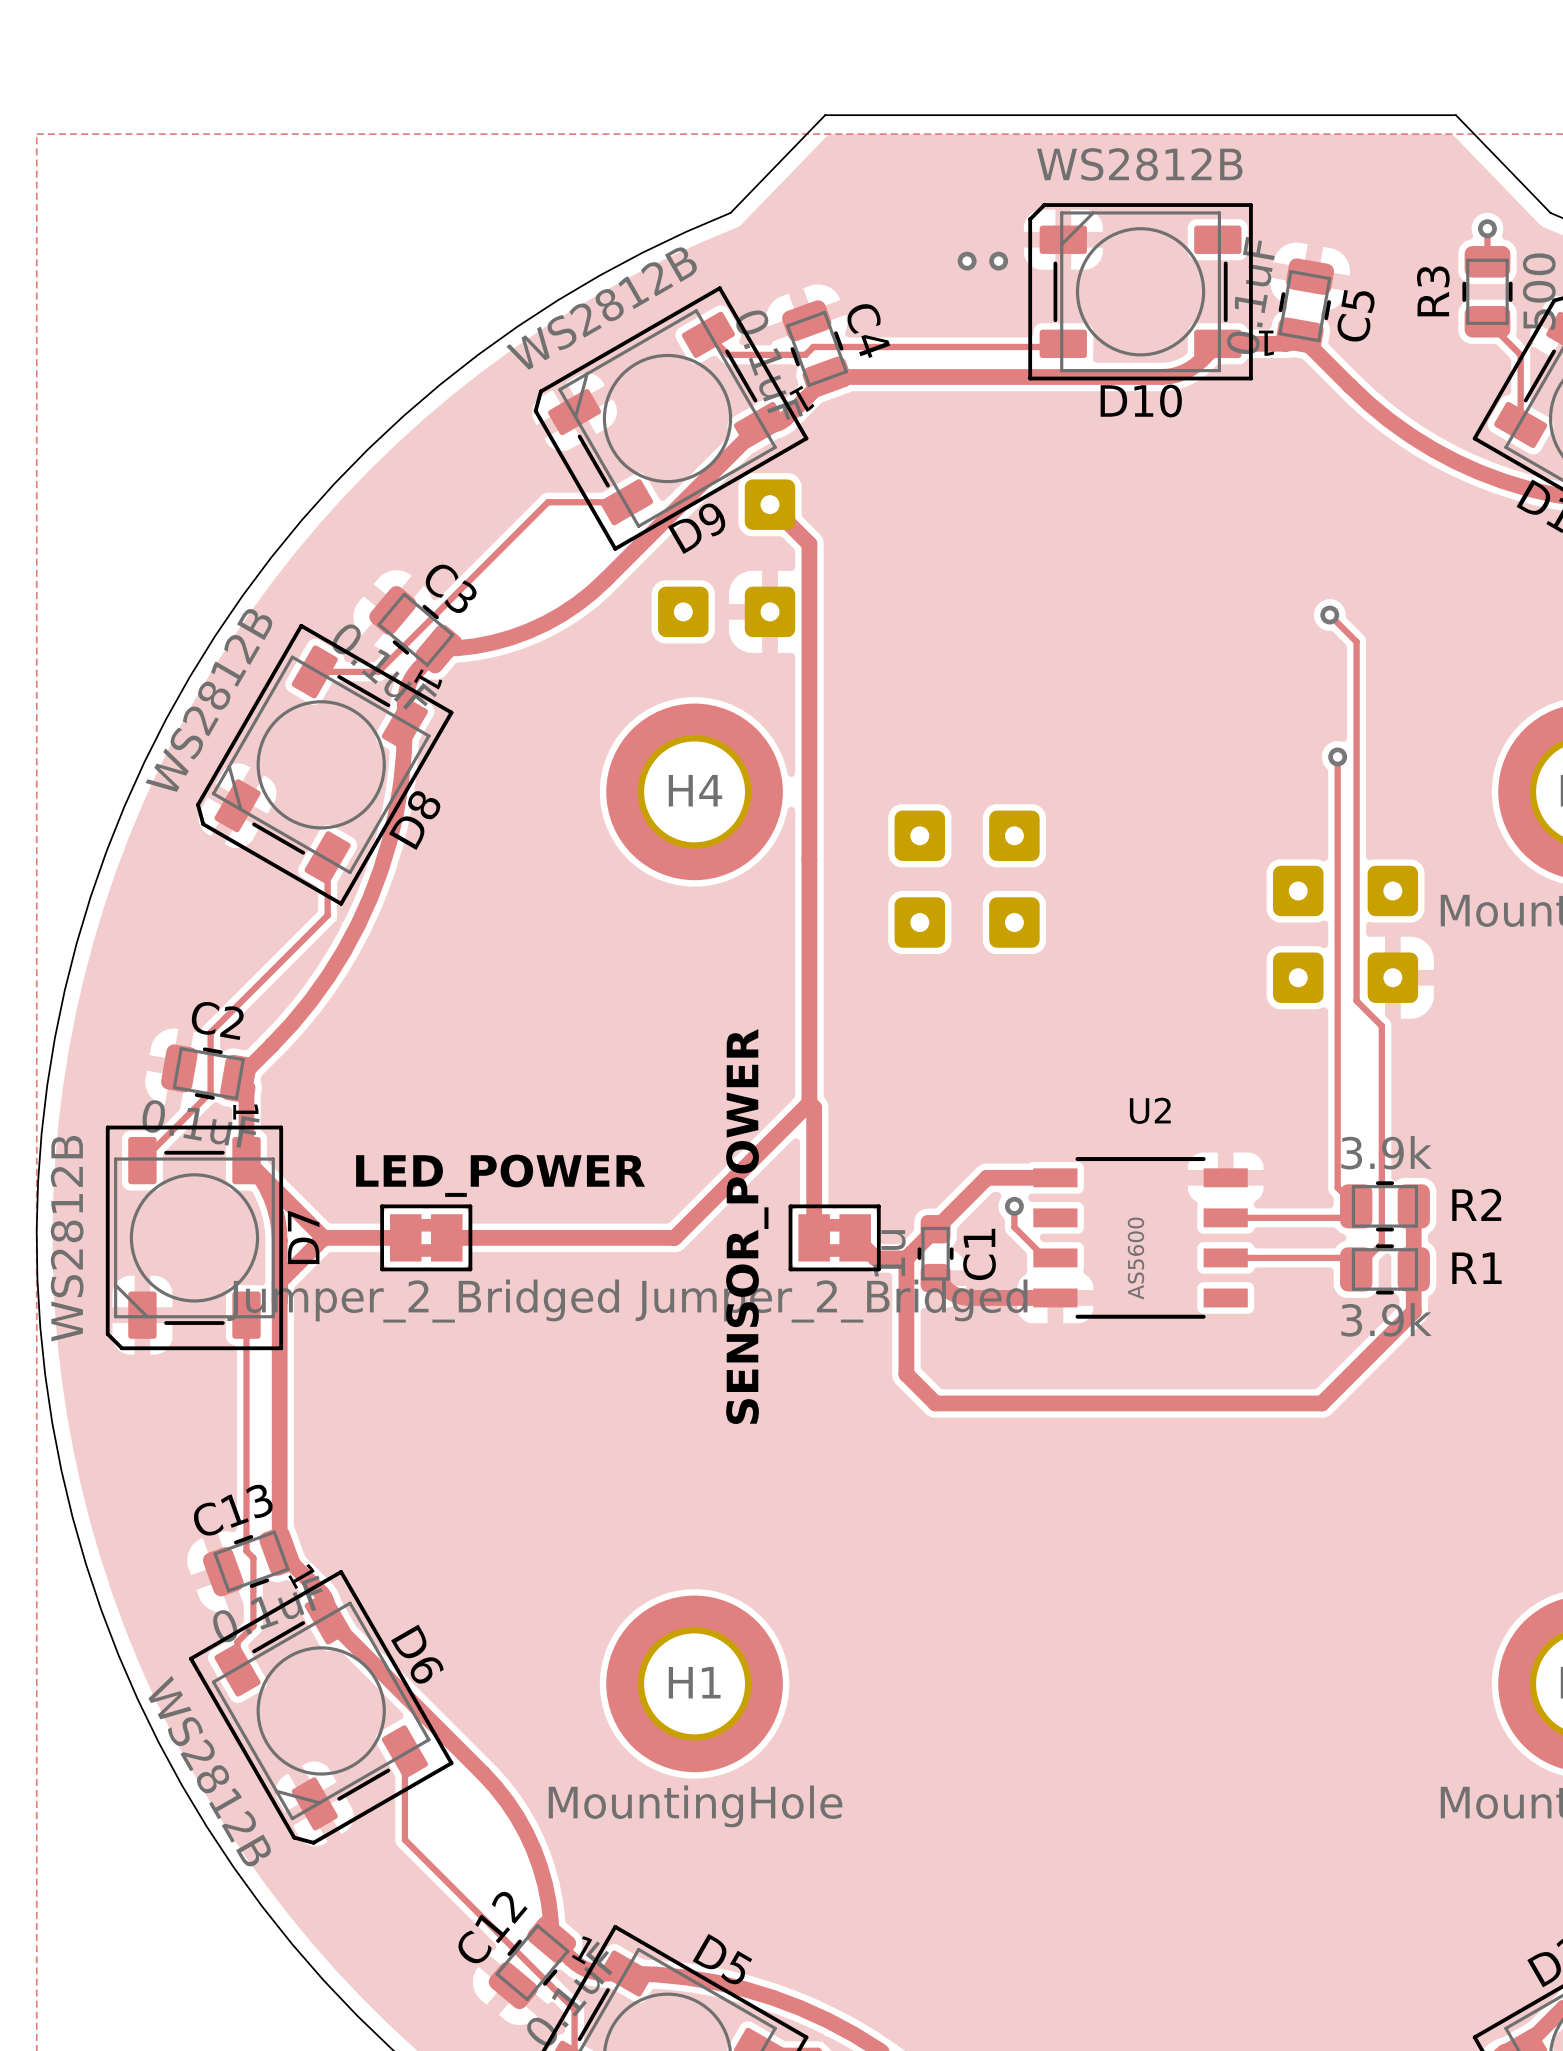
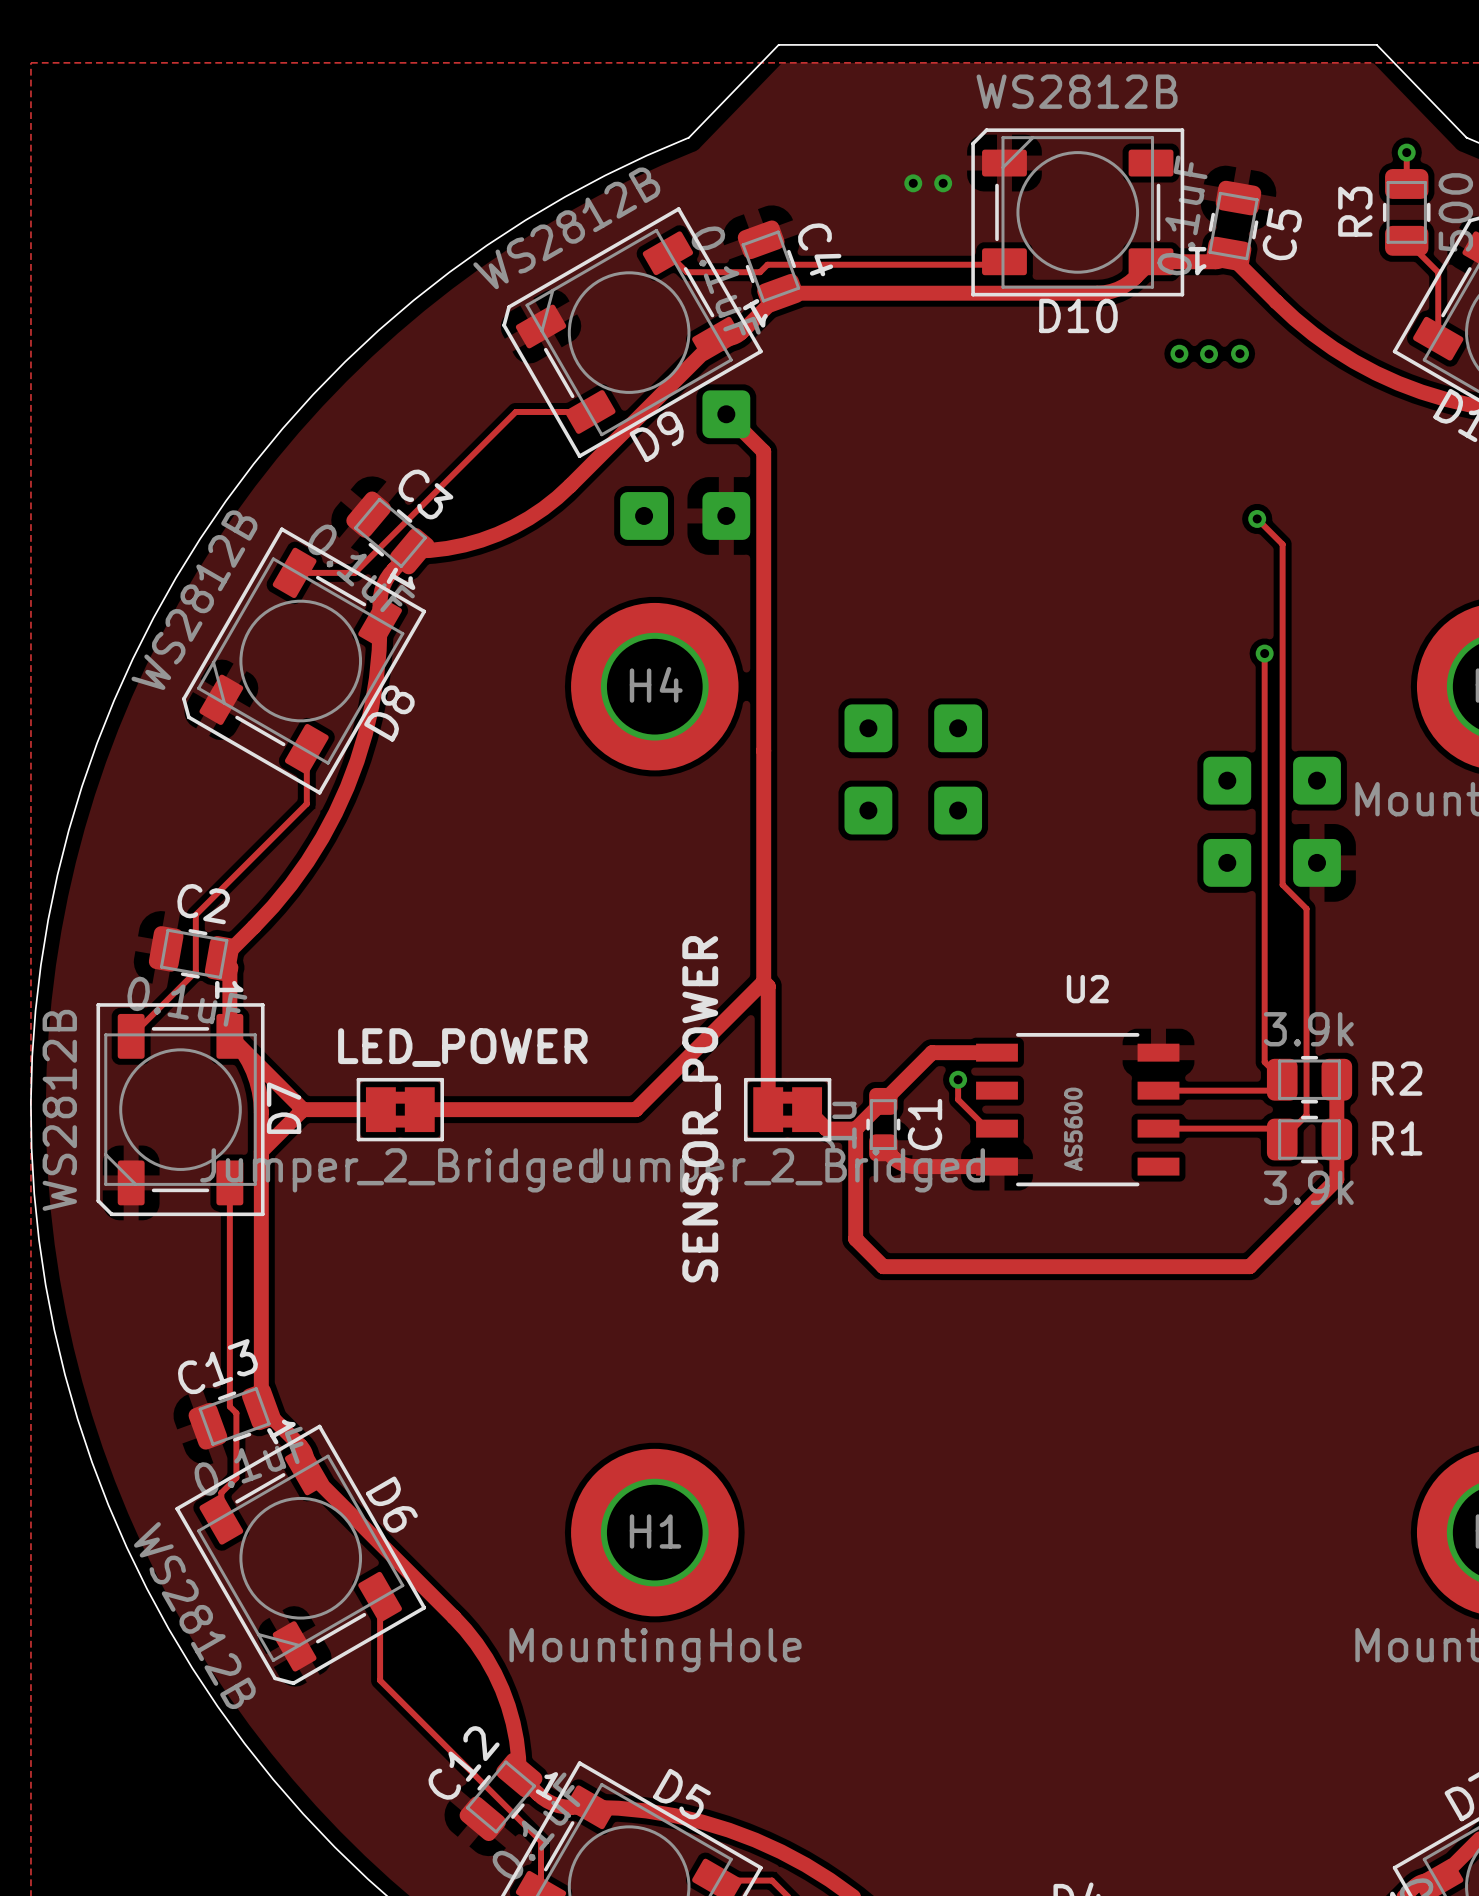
via: none -> (1179, 353)
via: none -> (1240, 353)
via: none -> (1209, 354)

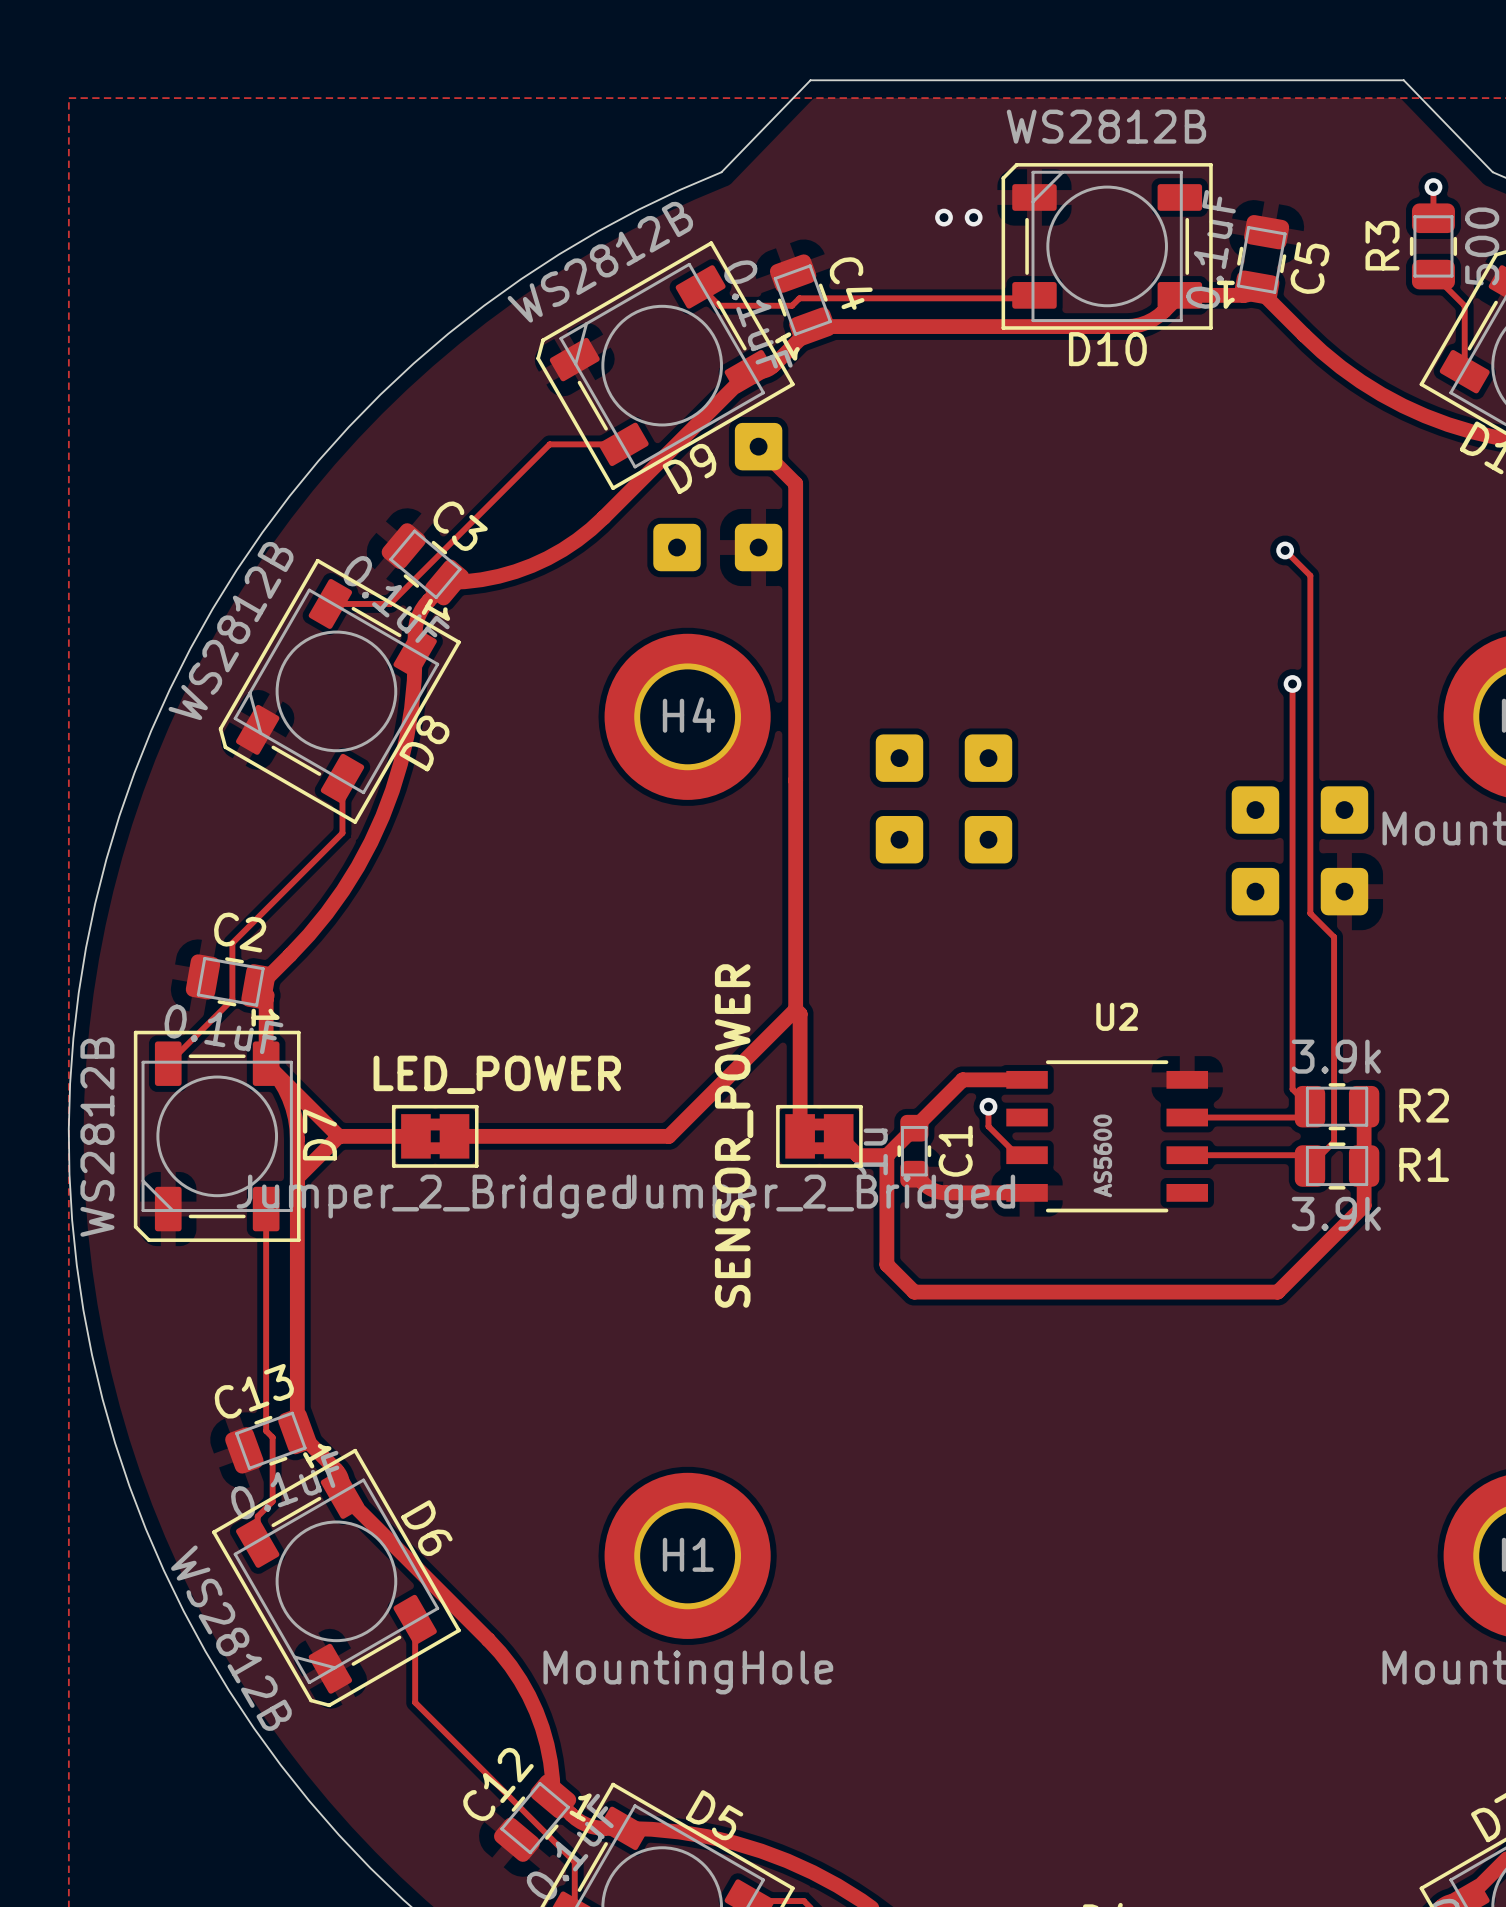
via: (1179, 353) -> none
via: (1240, 353) -> none
via: (1209, 354) -> none

